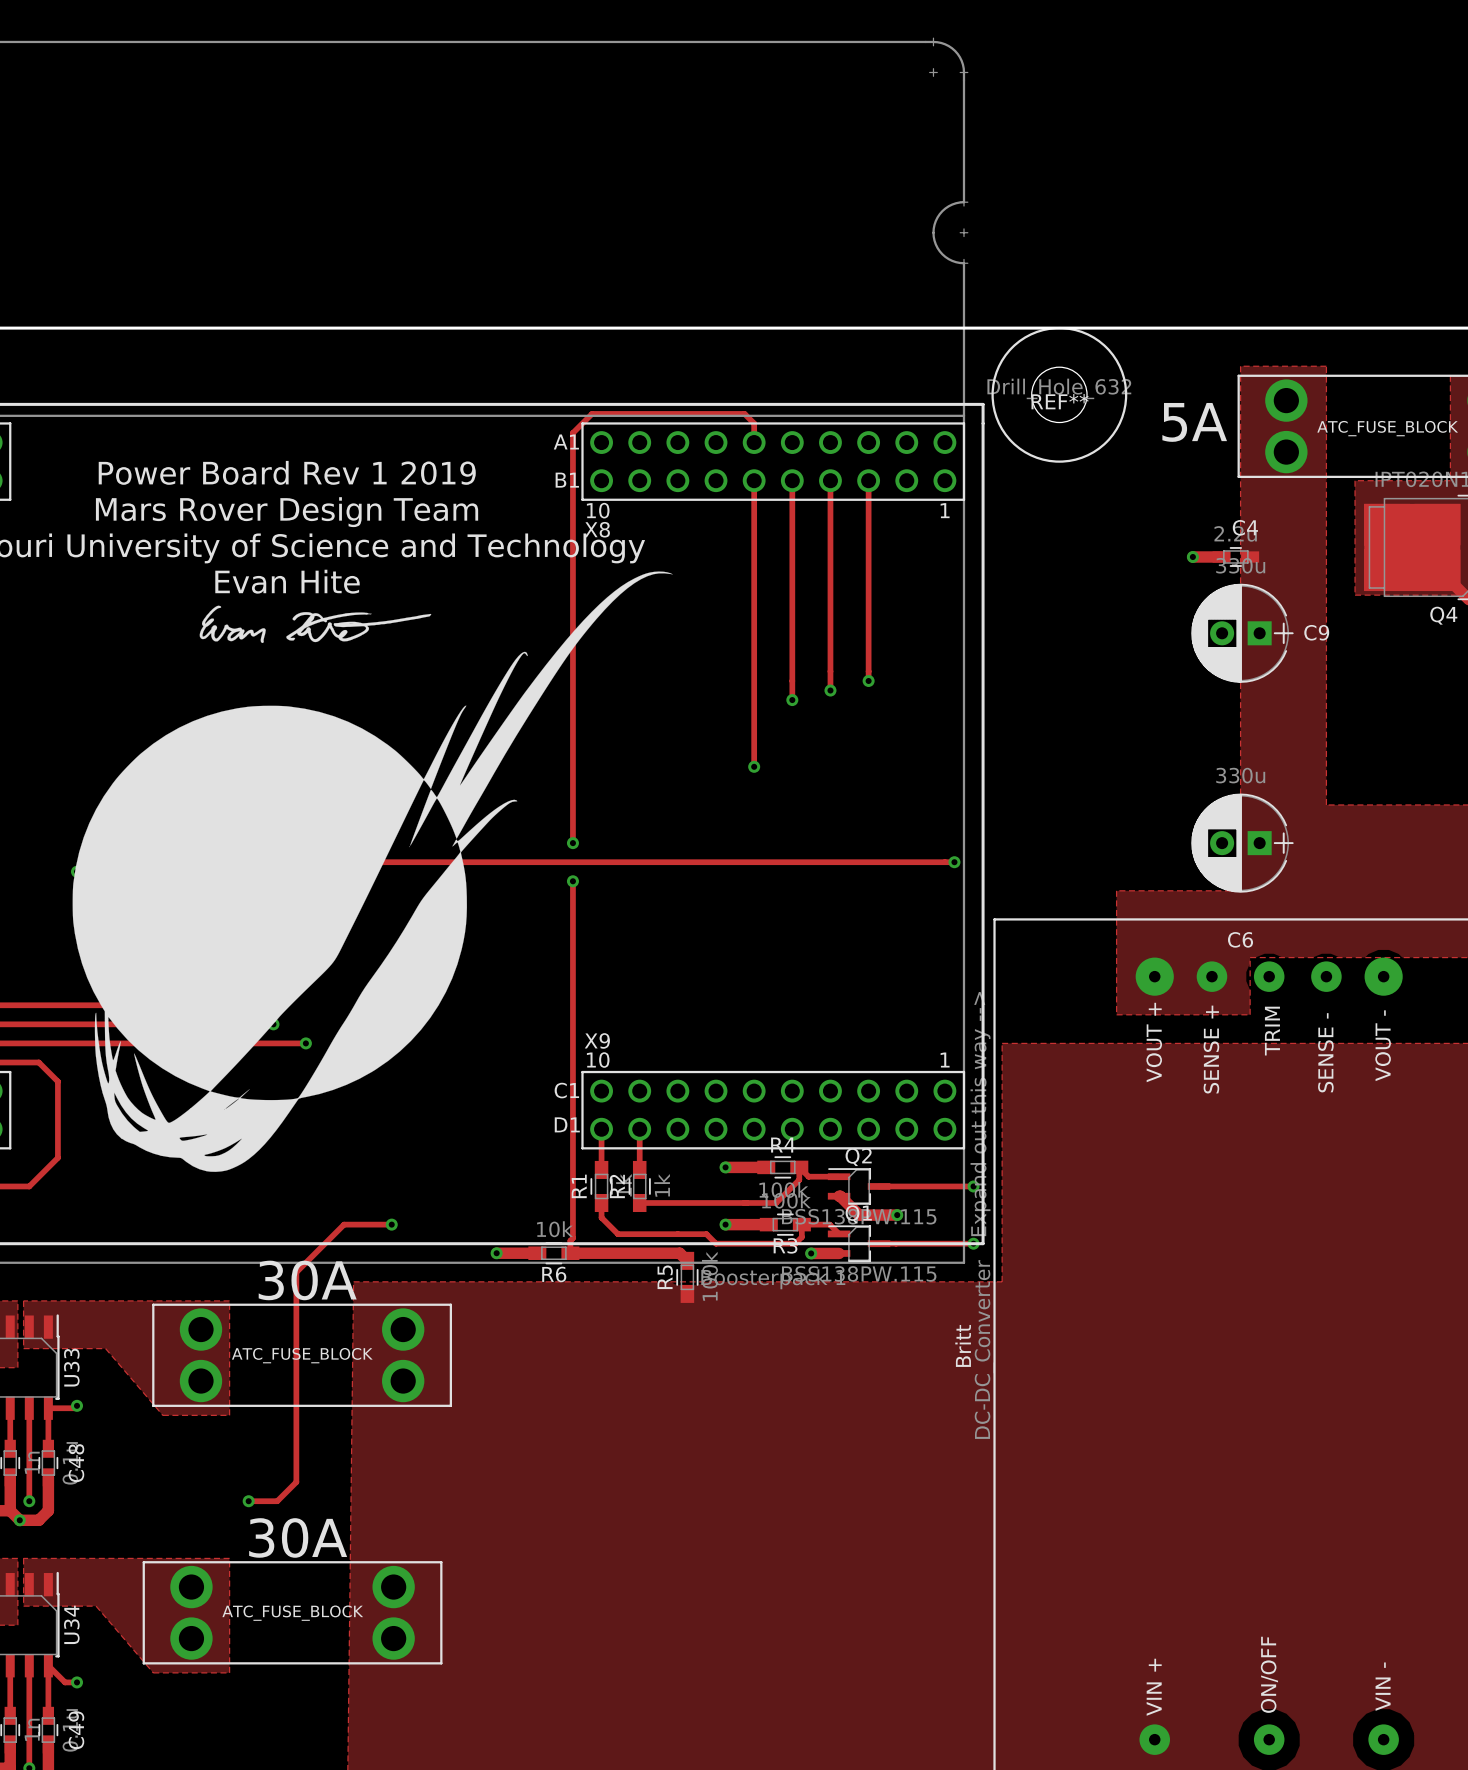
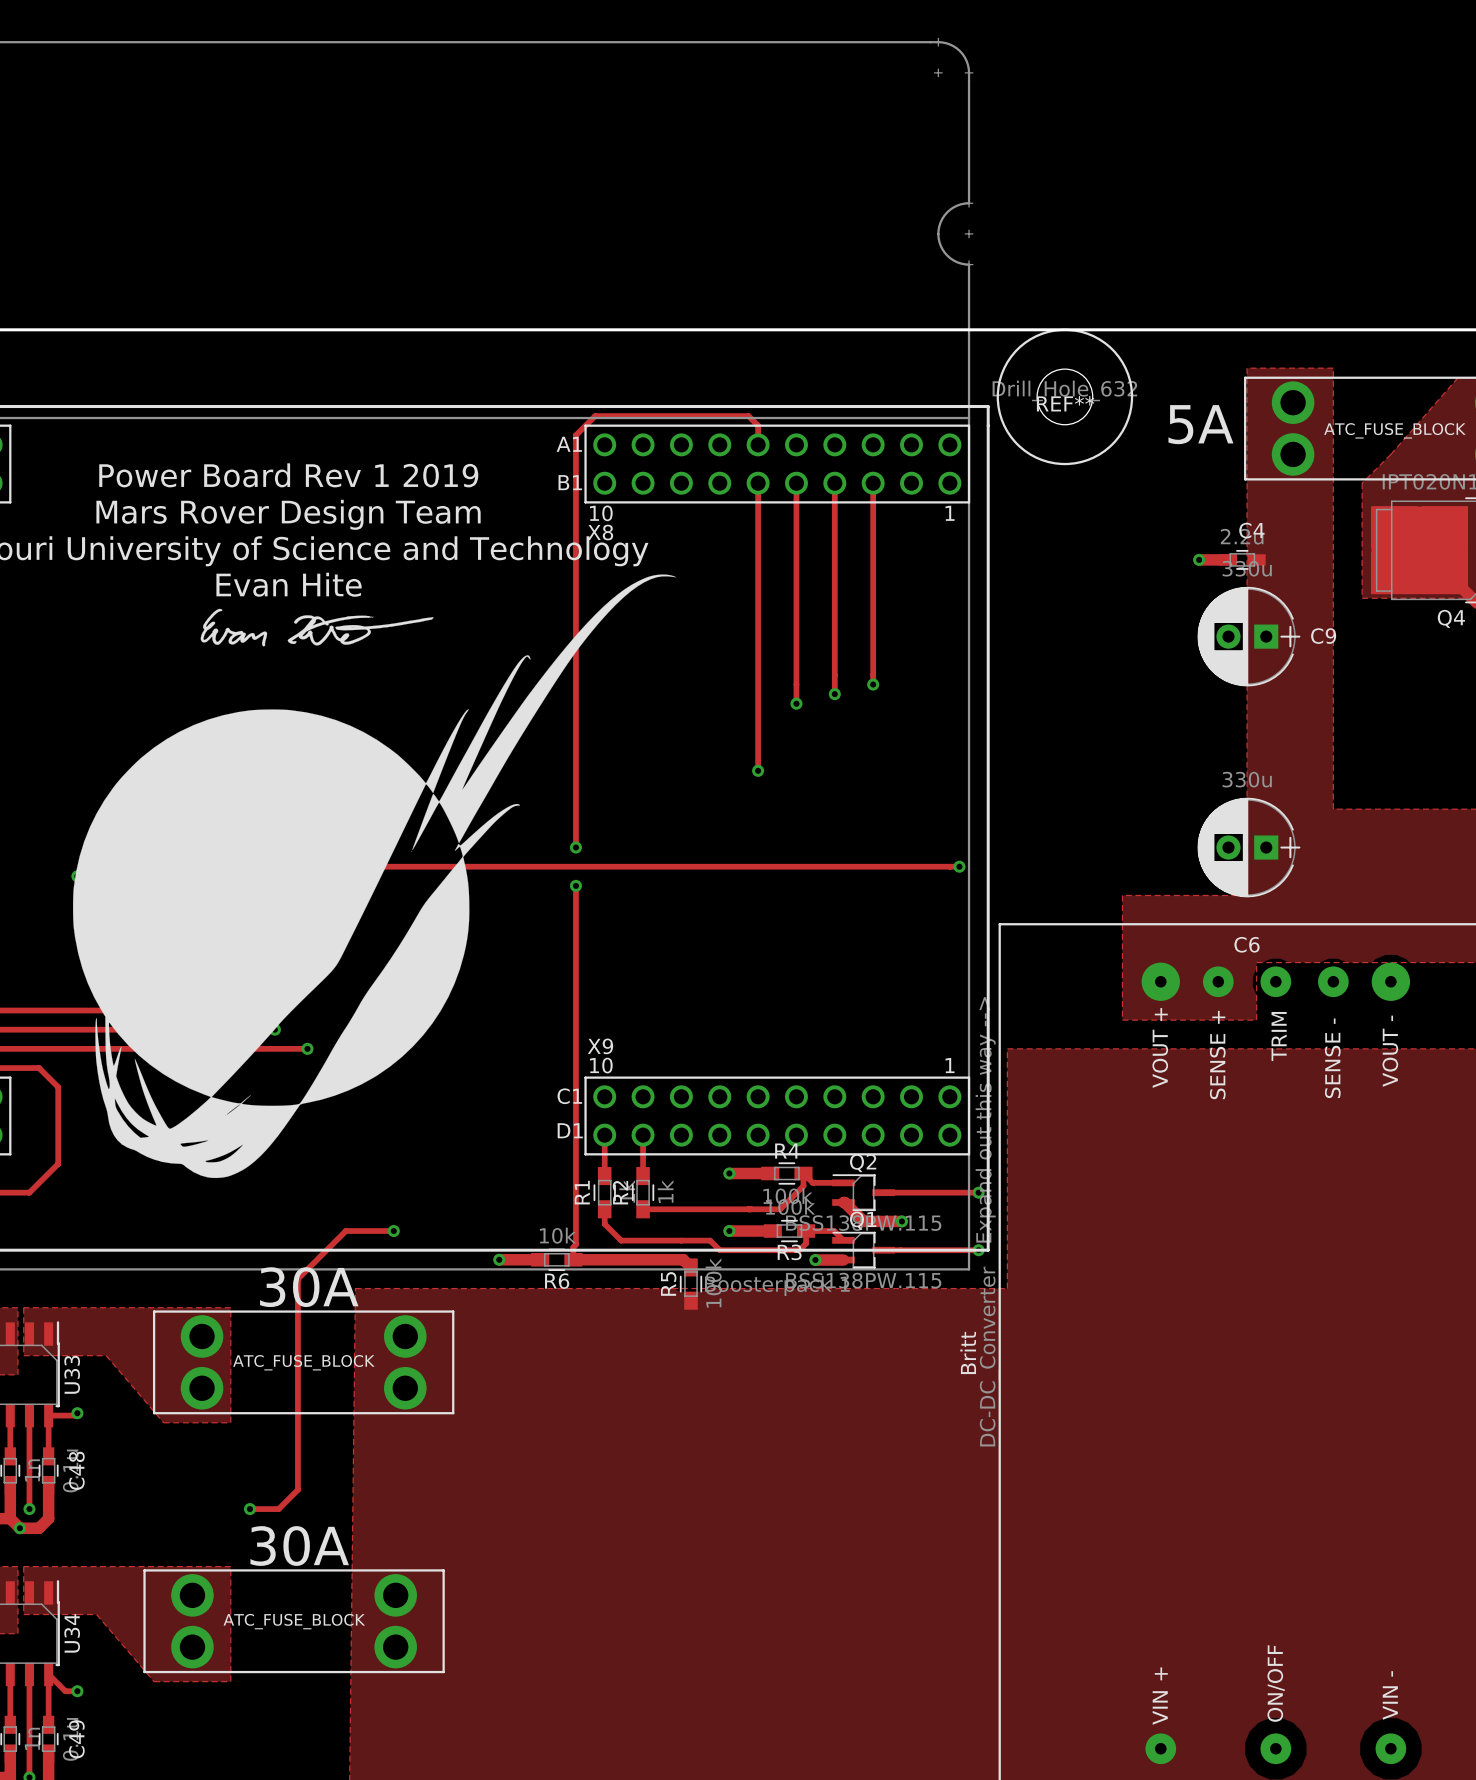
zone outline: (1450, 375) (1450, 480) (1355, 480) -> (1457, 377) (1390, 454) (1362, 483)

